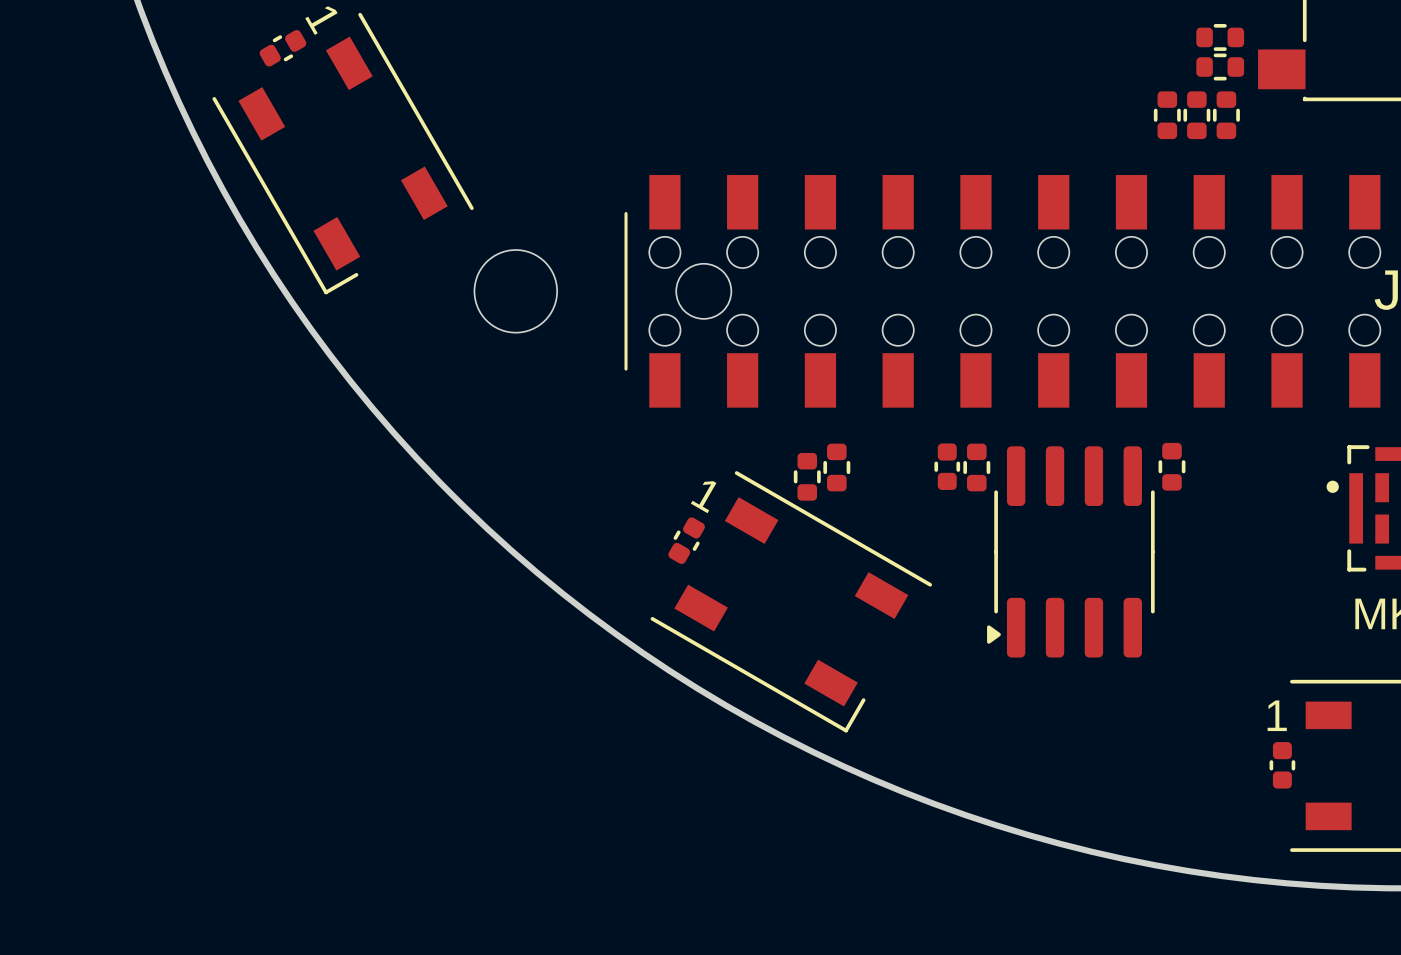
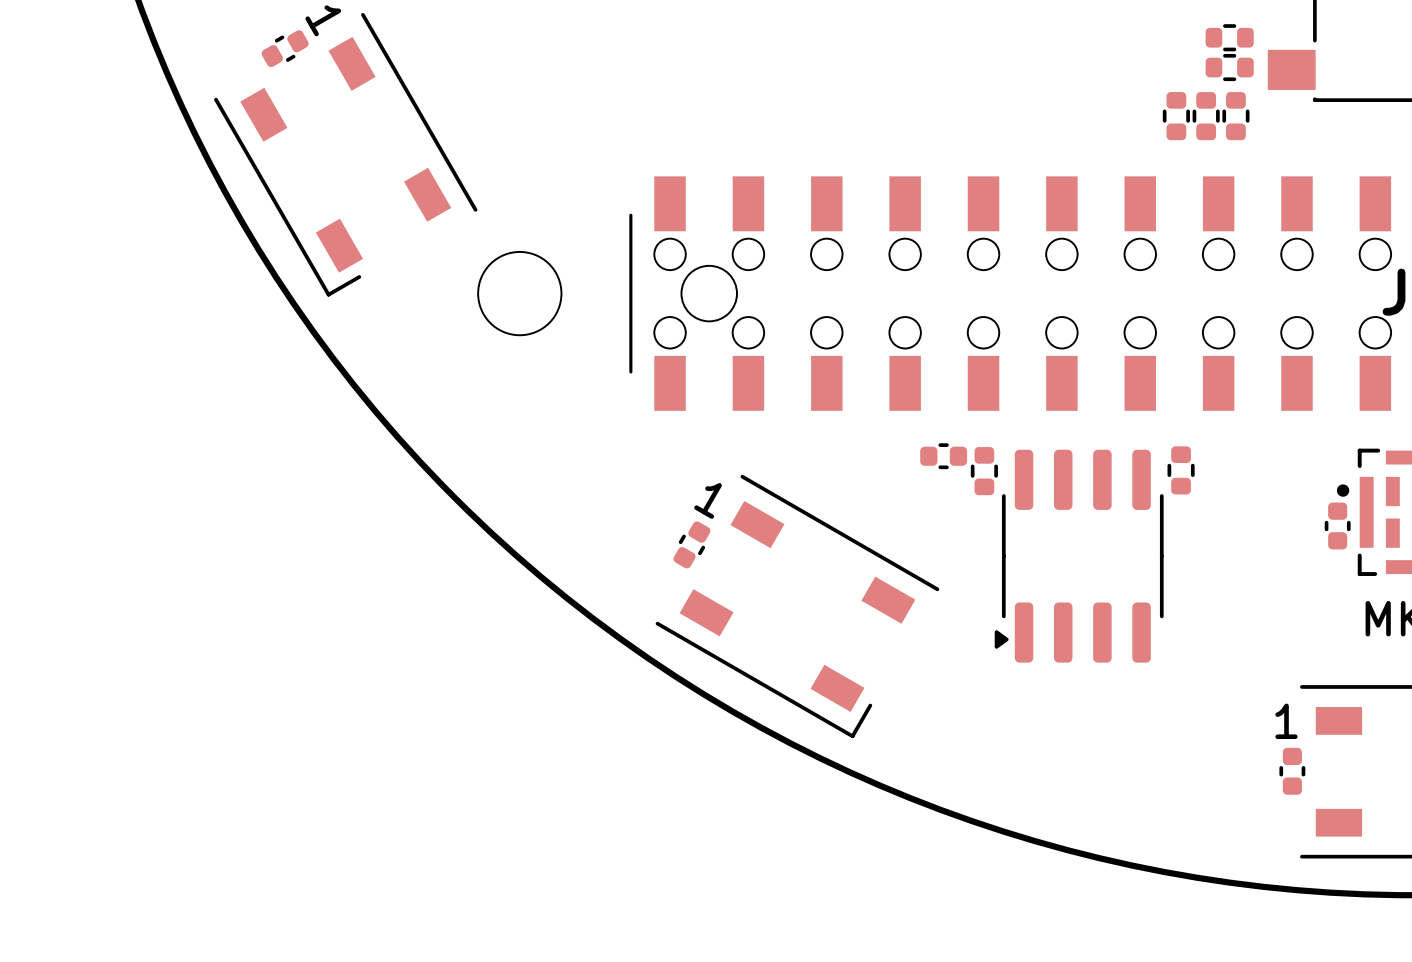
part rotation: 0° (947, 466) -> 90° clockwise (943, 456)
part: (836, 467) -> none
part: (807, 476) -> none
part: none -> (1337, 525)

